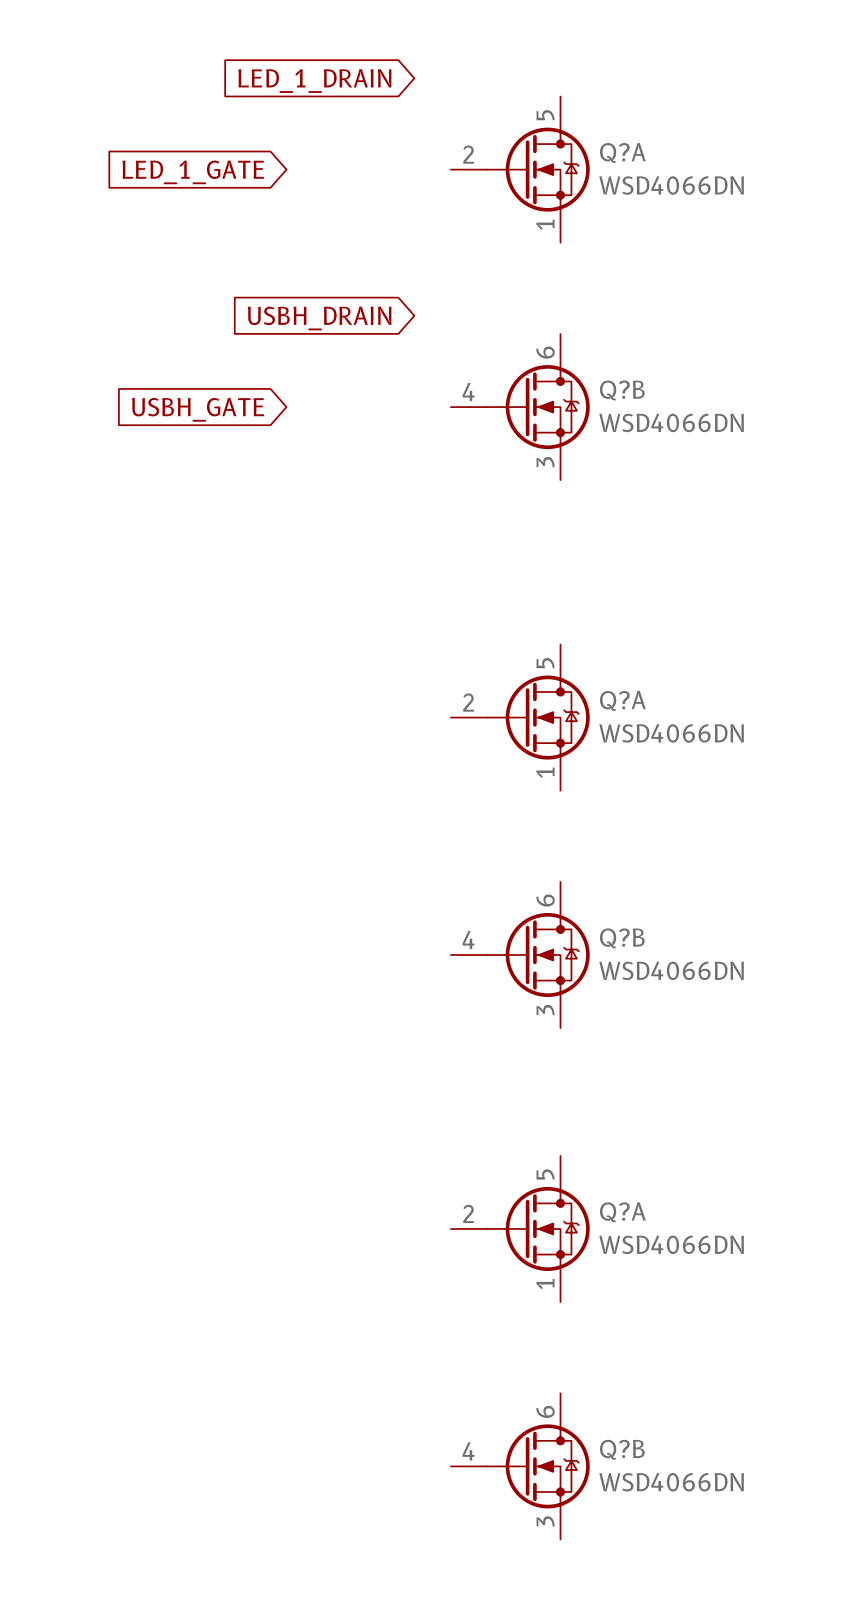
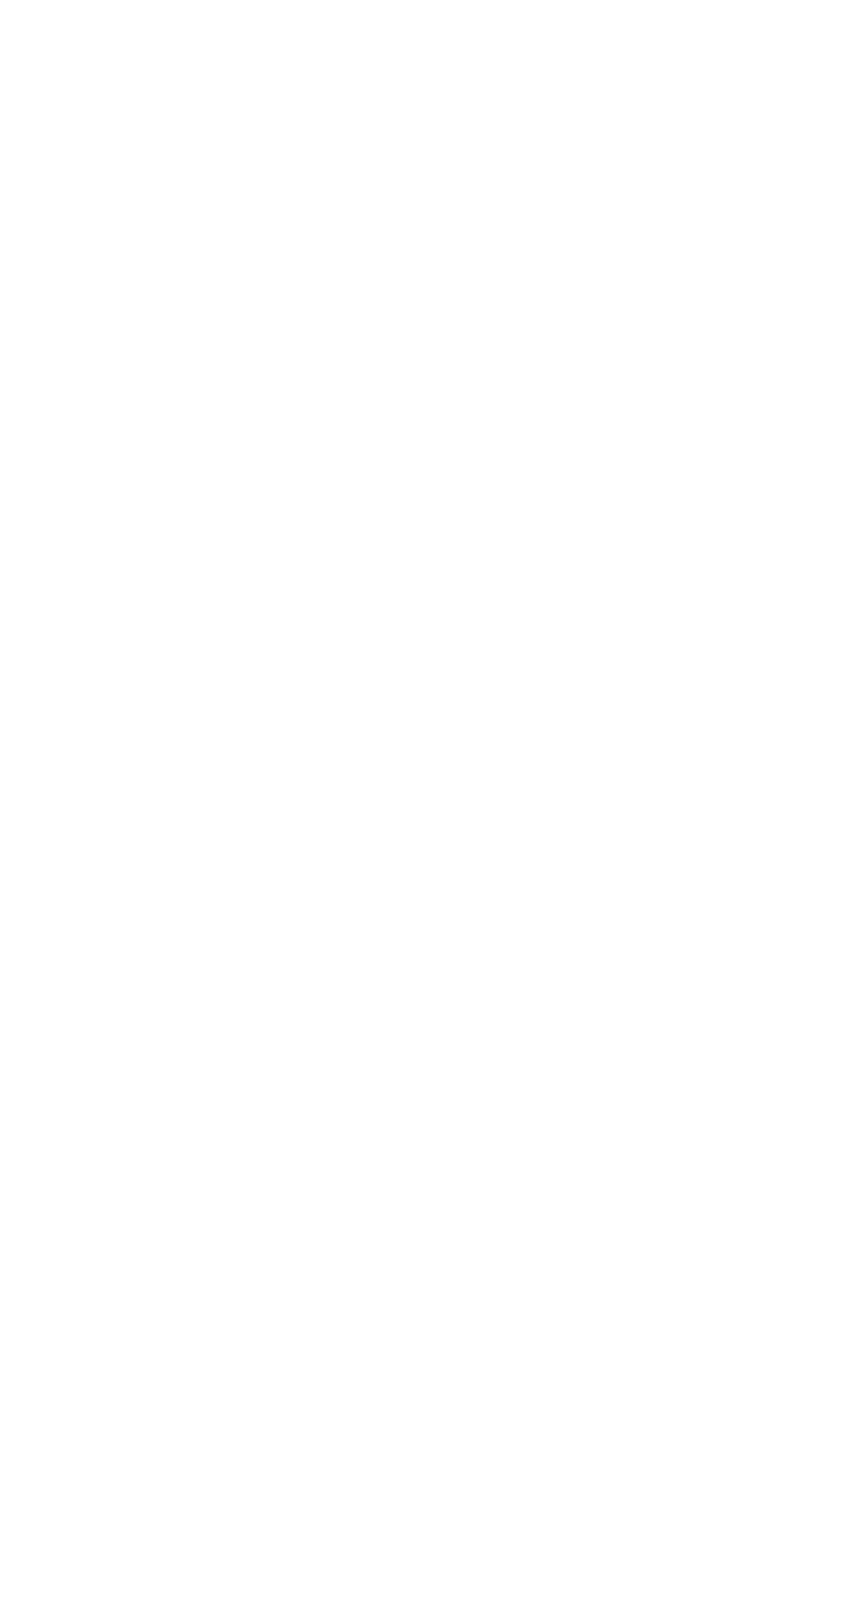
global label: LED_1_DRAIN (314, 81) -> none
Q?A: WSD4066DN (520, 169) -> none
global label: LED_1_GATE (193, 172) -> none
global label: USBH_DRAIN (319, 318) -> none
Q?B: WSD4066DN (520, 407) -> none
global label: USBH_GATE (198, 409) -> none
Q?A: WSD4066DN (520, 717) -> none
Q?B: WSD4066DN (520, 955) -> none
Q?A: WSD4066DN (520, 1228) -> none
Q?B: WSD4066DN (520, 1466) -> none

